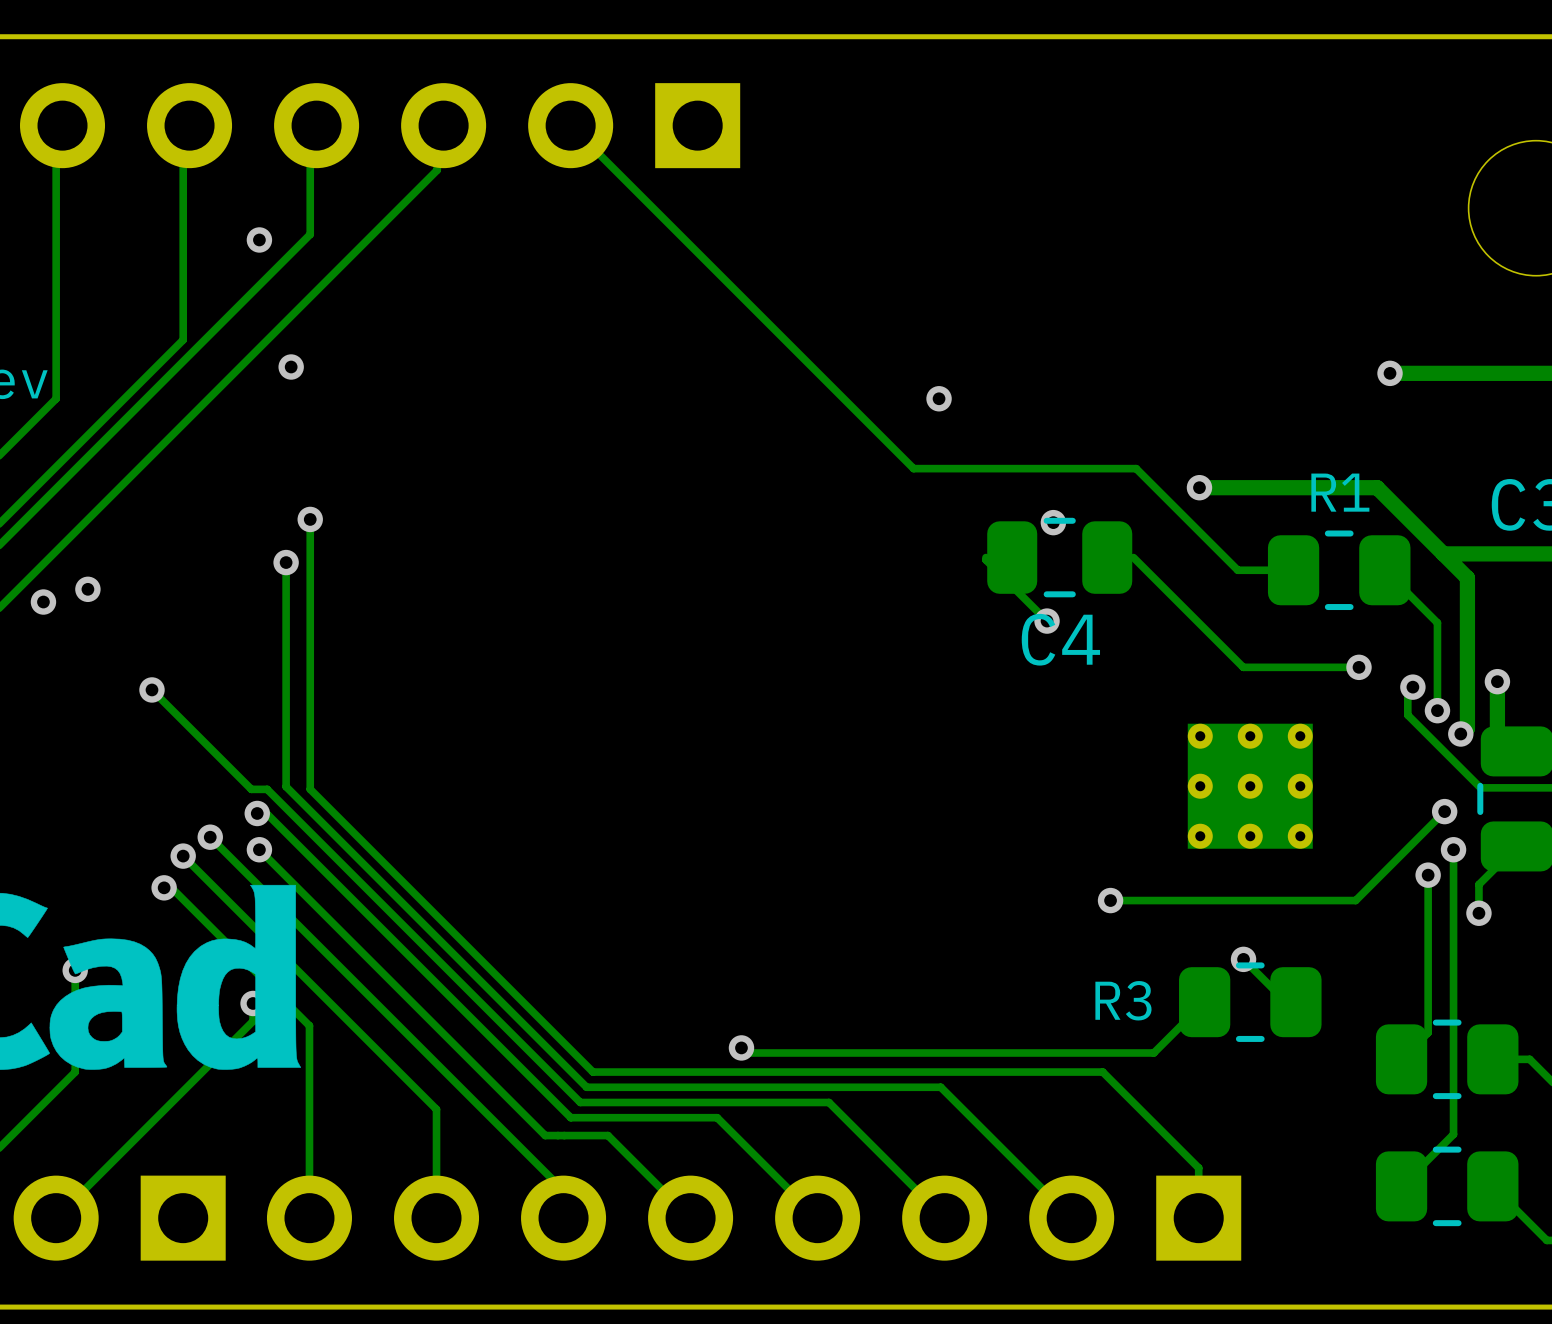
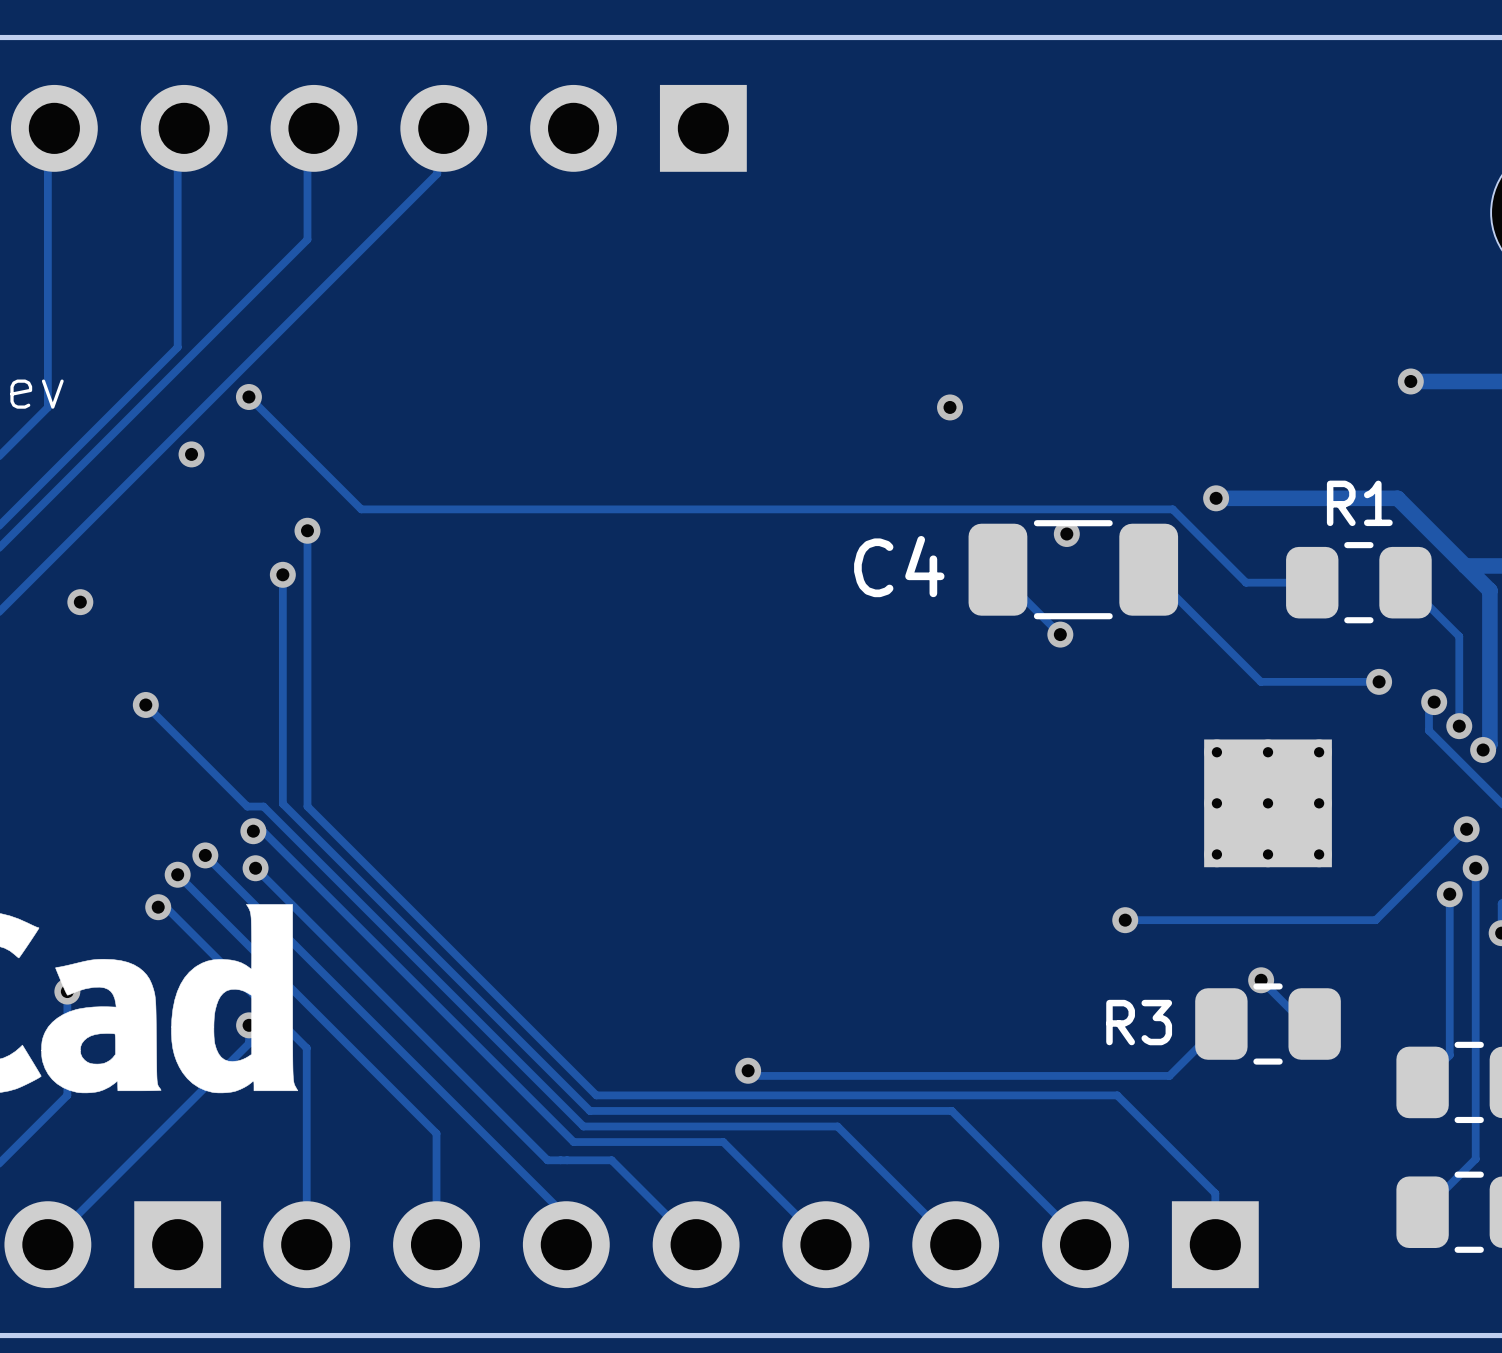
track: (570, 125) (913, 468) (1136, 468) (1237, 570) -> (248, 396) (361, 509) (1172, 509) (1246, 582) (1255, 582)
via: (259, 239) -> none
via position: (291, 367) -> (248, 396)
via: none -> (191, 454)
C4 footprint: [987, 517, 1133, 598] -> [968, 520, 1179, 620]
via: (43, 602) -> none
C4 name position: C4 (1060, 639) -> C4 (899, 566)

